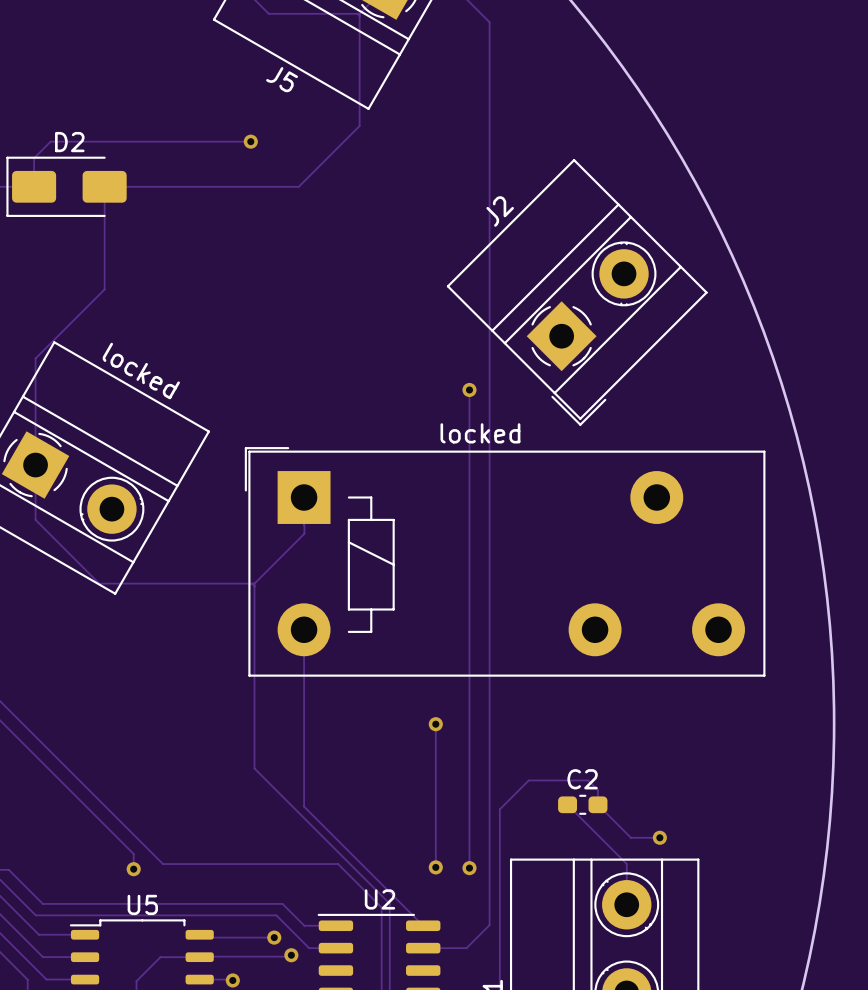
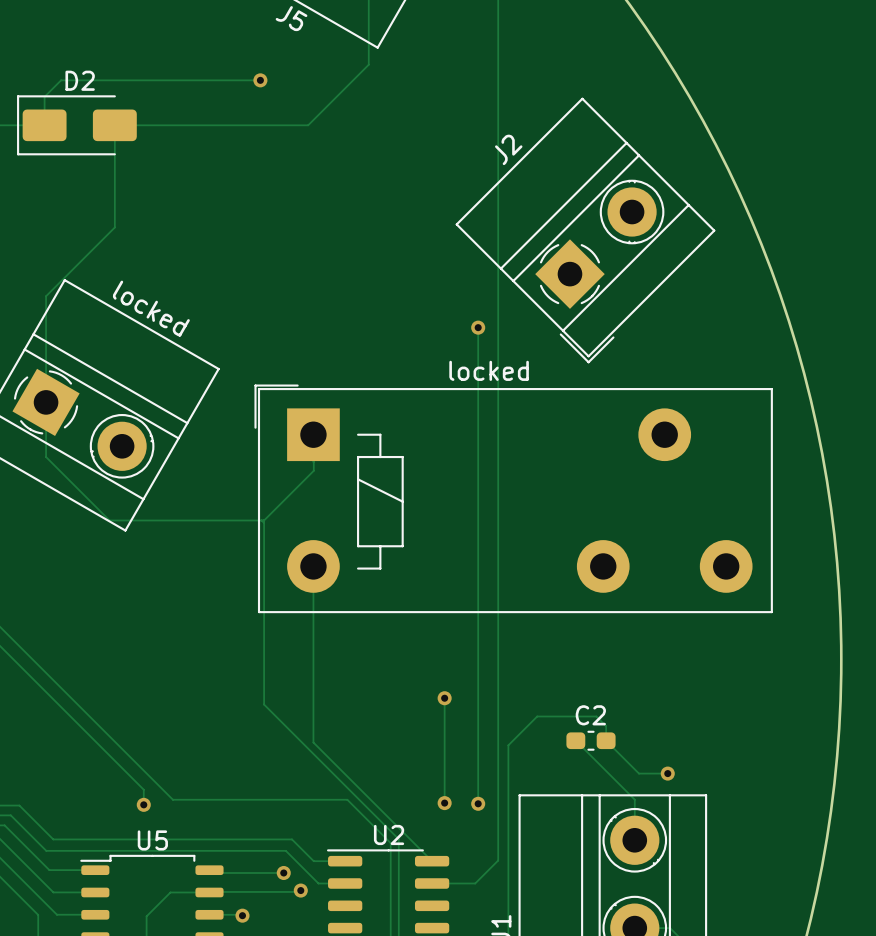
track: (435, 724) (435, 762) -> none
via position: (435, 724) -> (444, 698)

